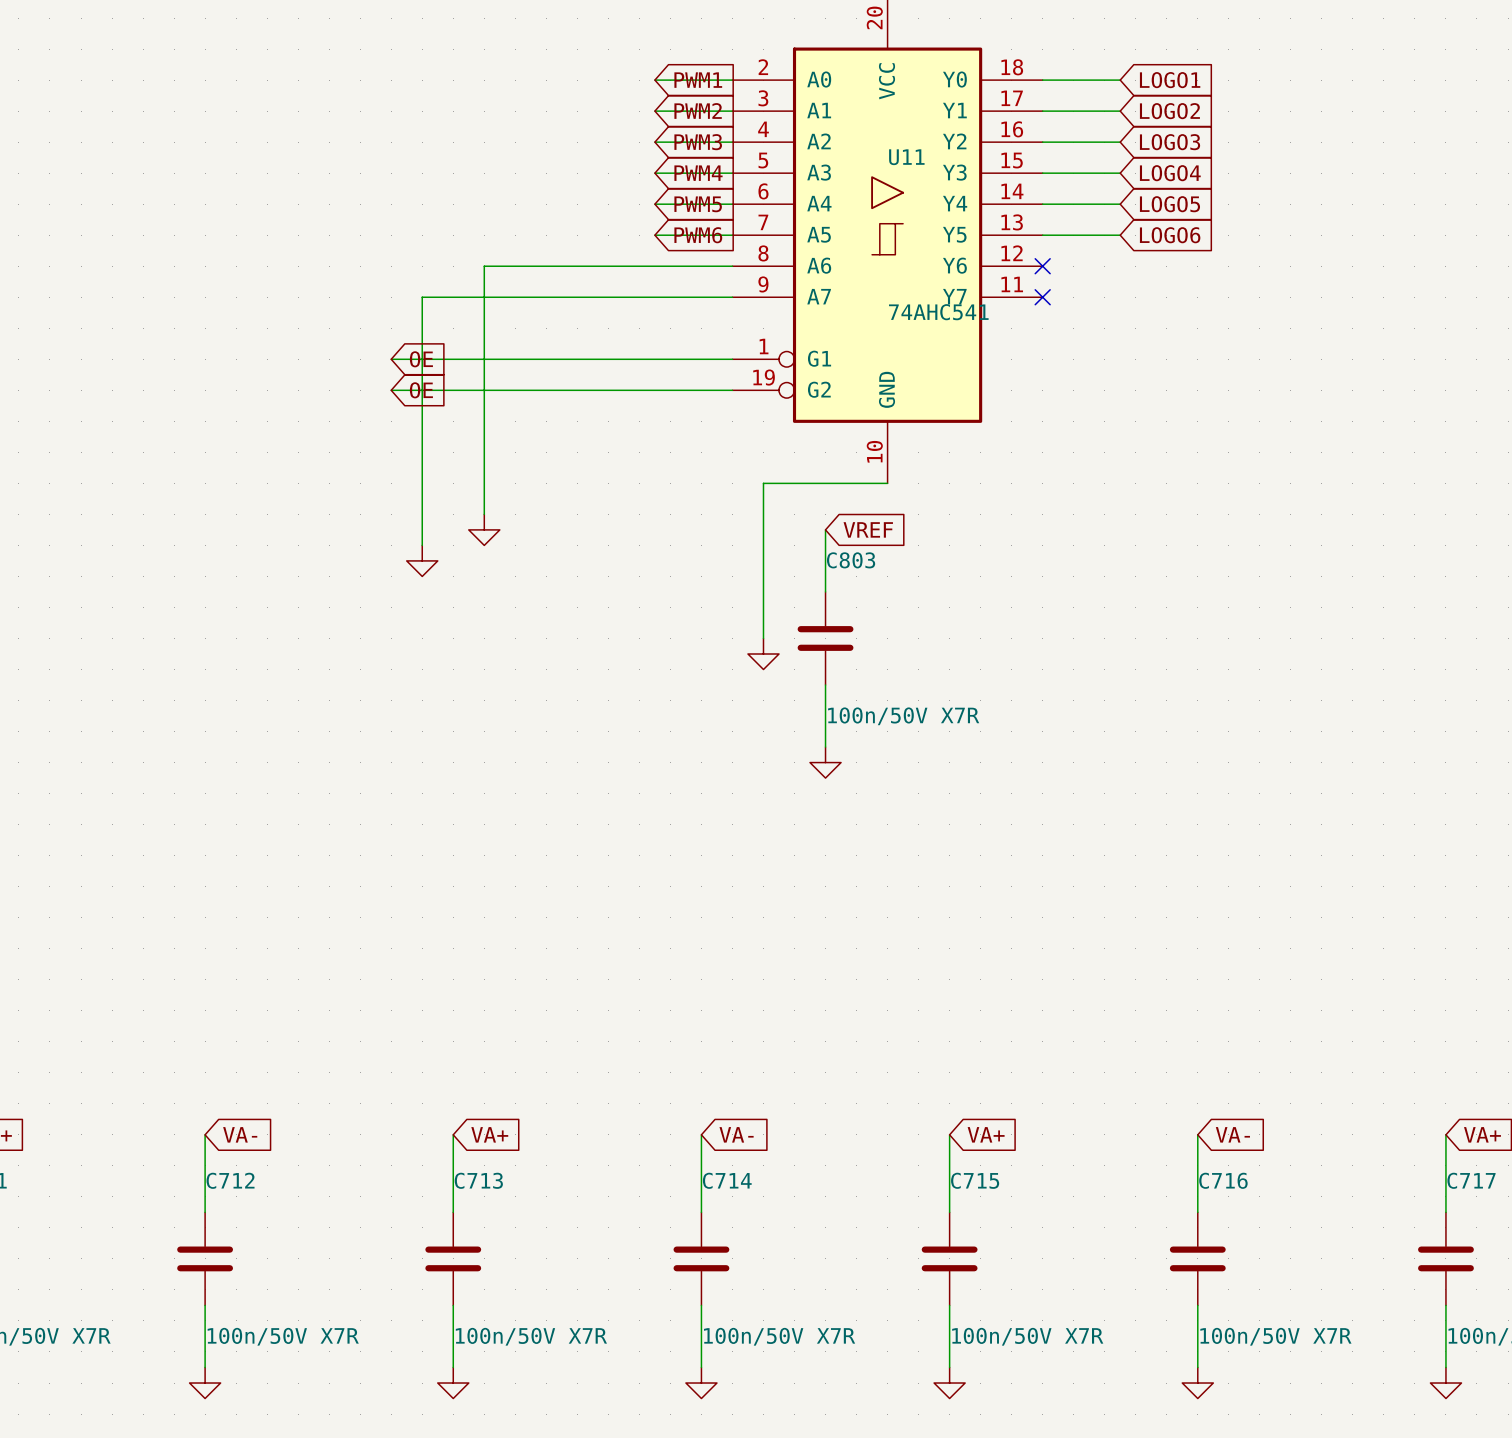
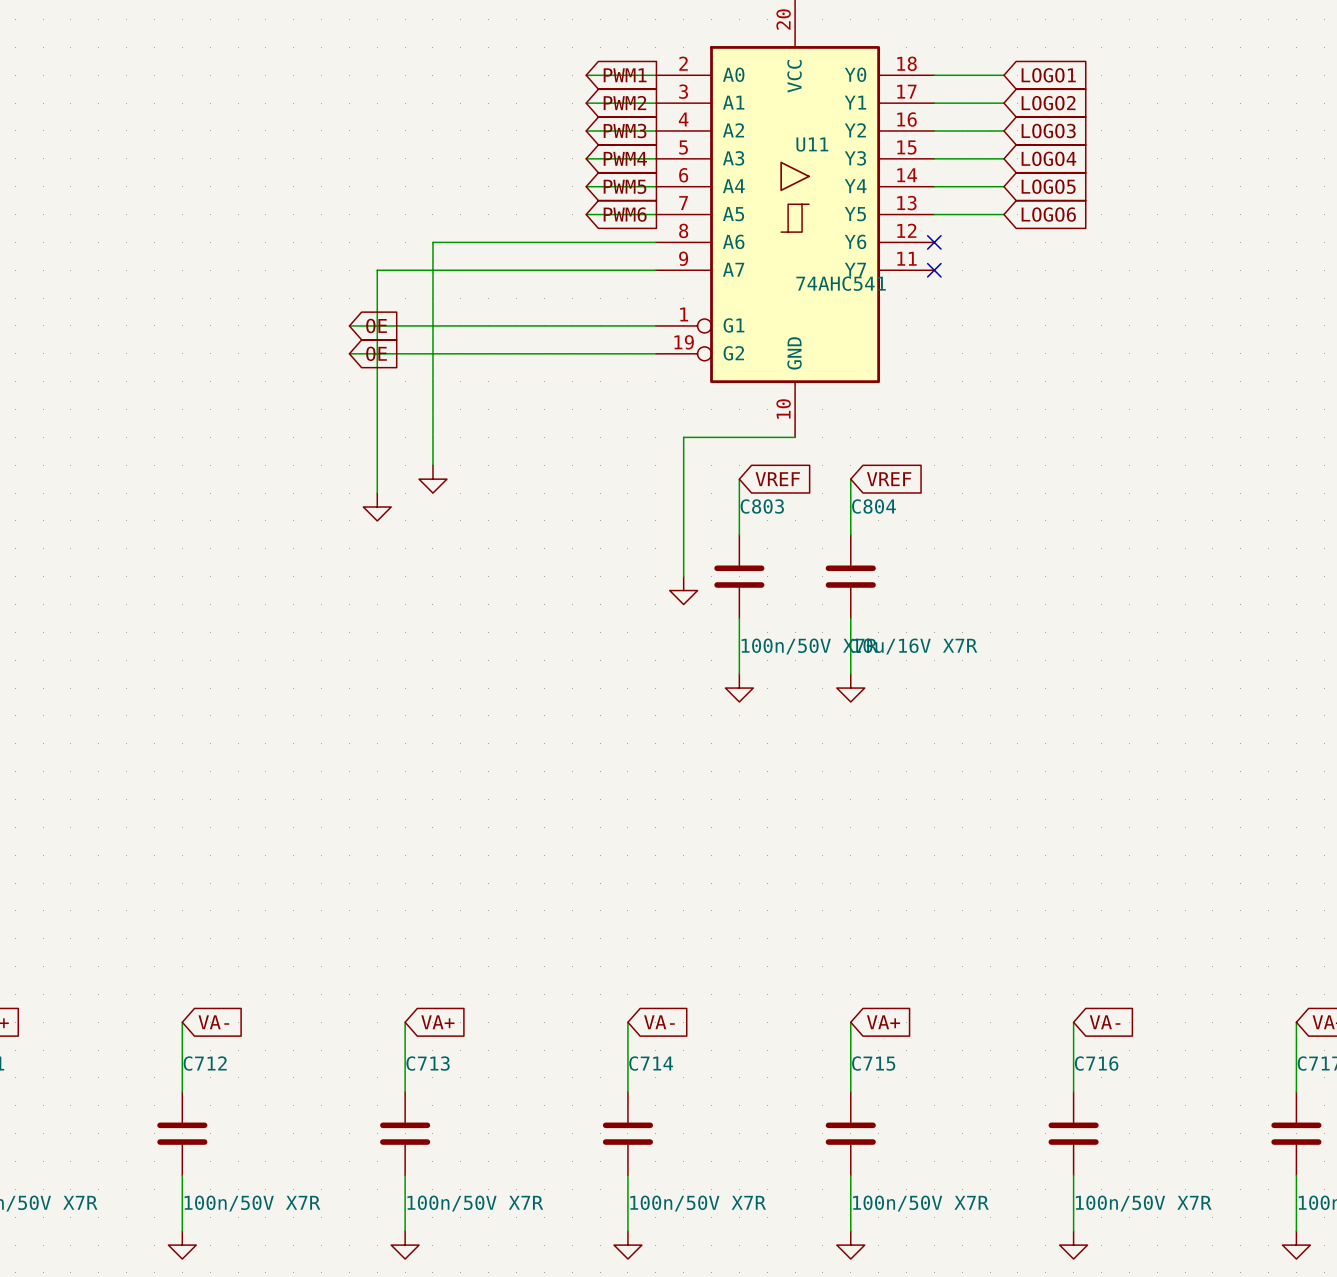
wire: none -> (850, 479) (850, 534)
global label: none -> VREF (889, 479)
C804: none -> 10u/16V X7R (850, 576)
wire: none -> (850, 618) (850, 674)
power symbol: none -> (850, 688)

